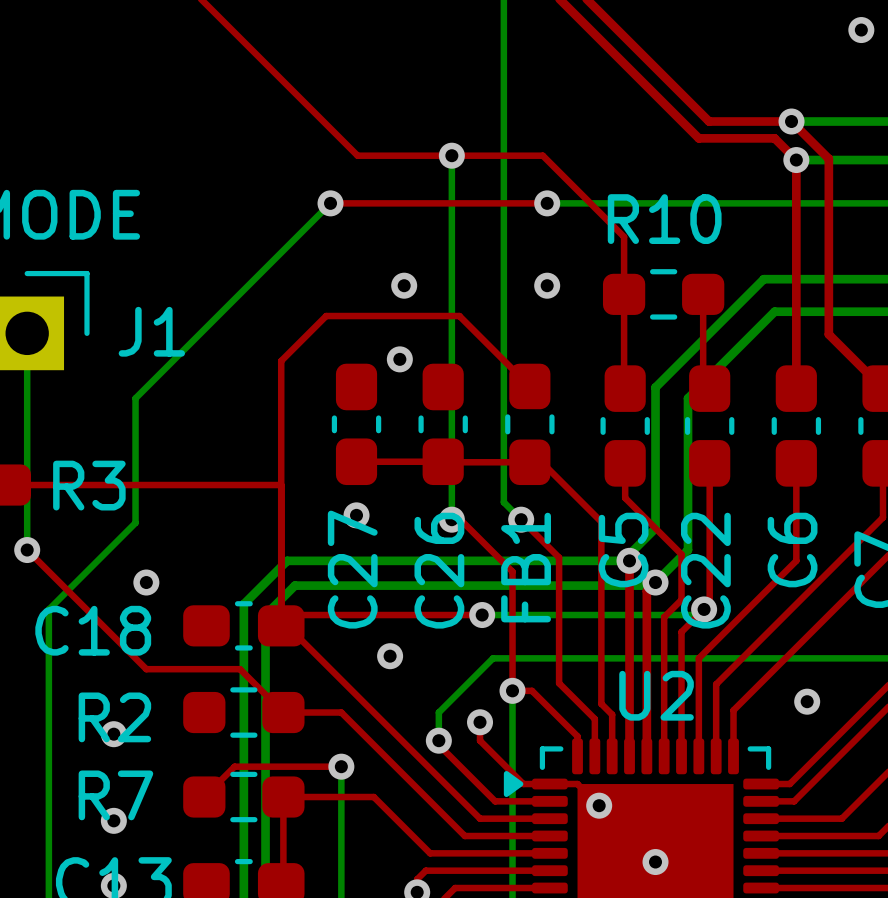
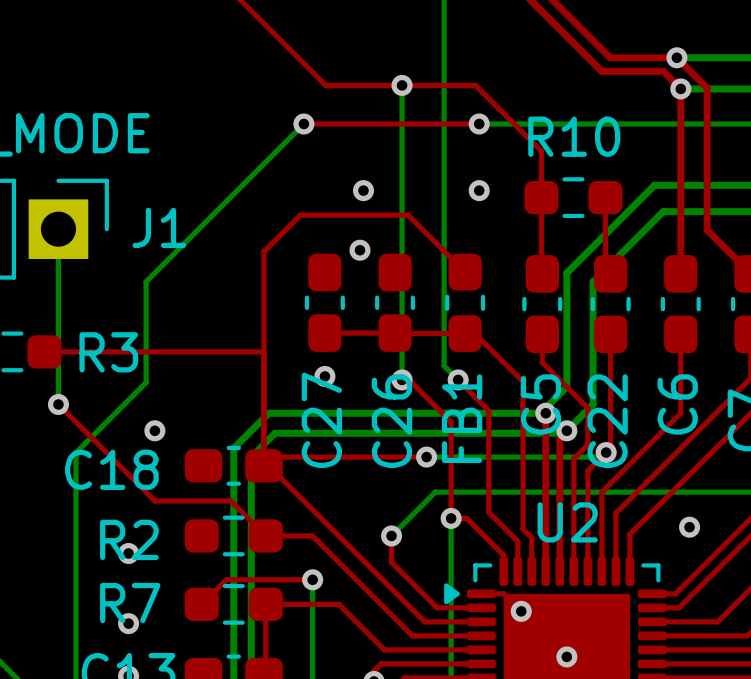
via: (390, 656) -> none
top track: none -> (391, 535) (391, 558)
bottom track: (438, 712) (438, 740) -> none
via: none -> (391, 535)
top track: (480, 722) (480, 740) (523, 784) (549, 784) -> none
via: (480, 722) -> none
via: (438, 740) -> none

